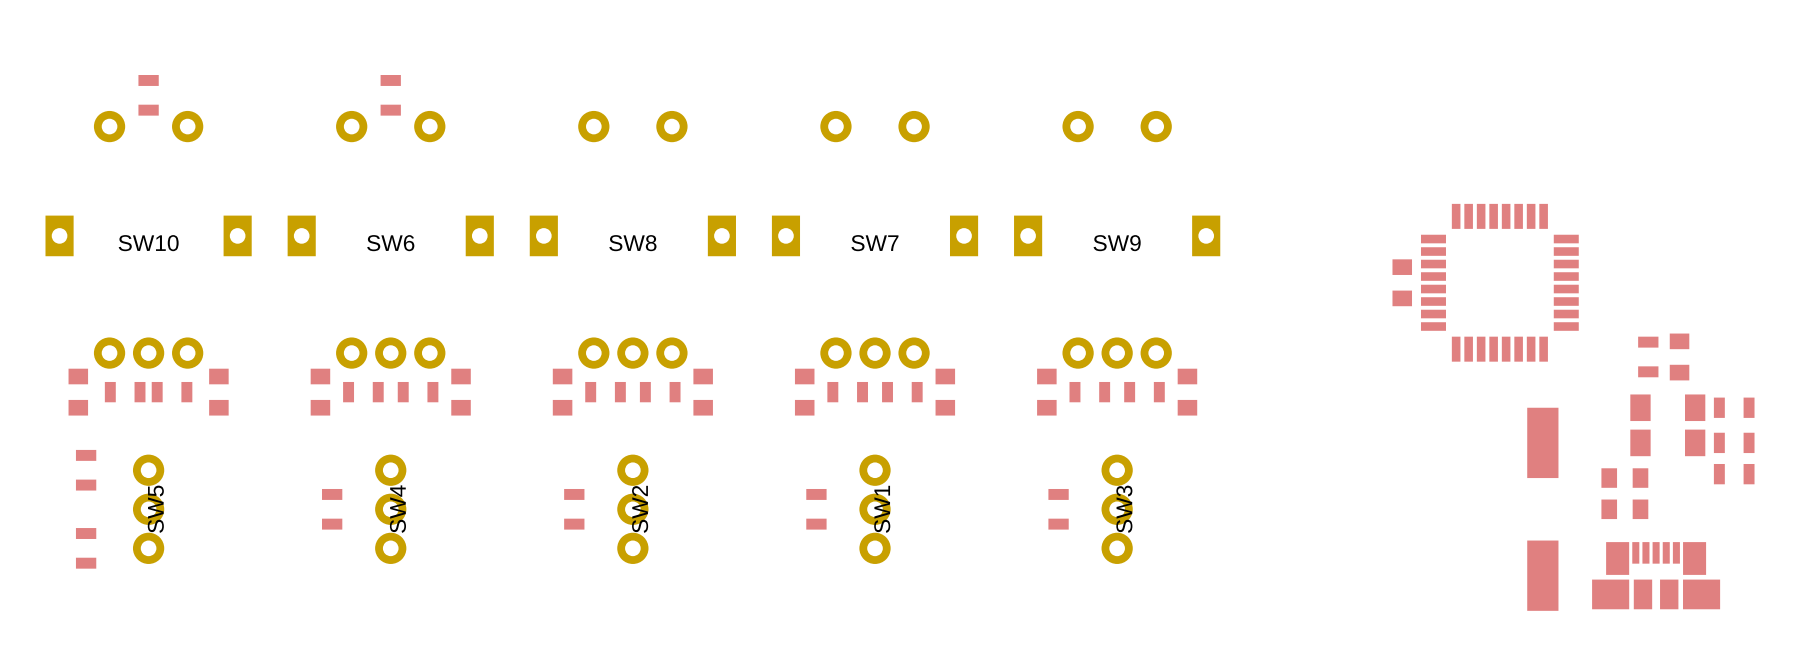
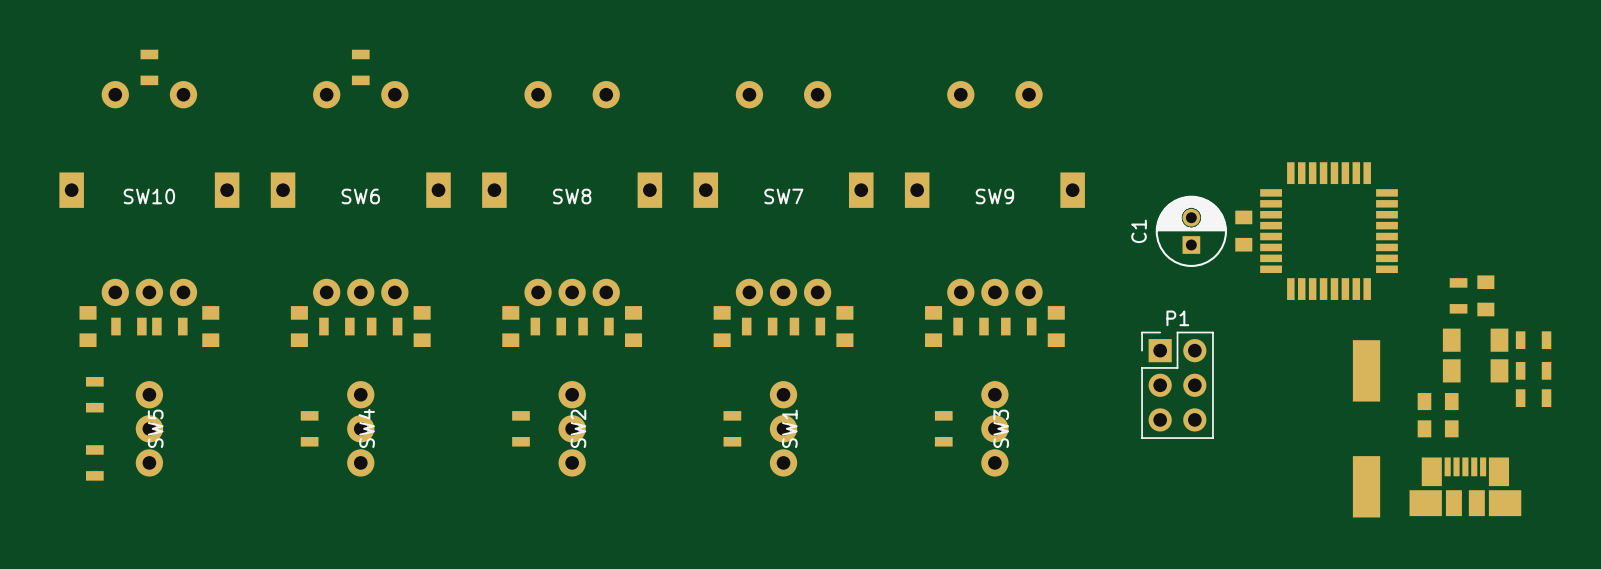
C1: none -> (1191, 231)
P1: none -> (1177, 385)

